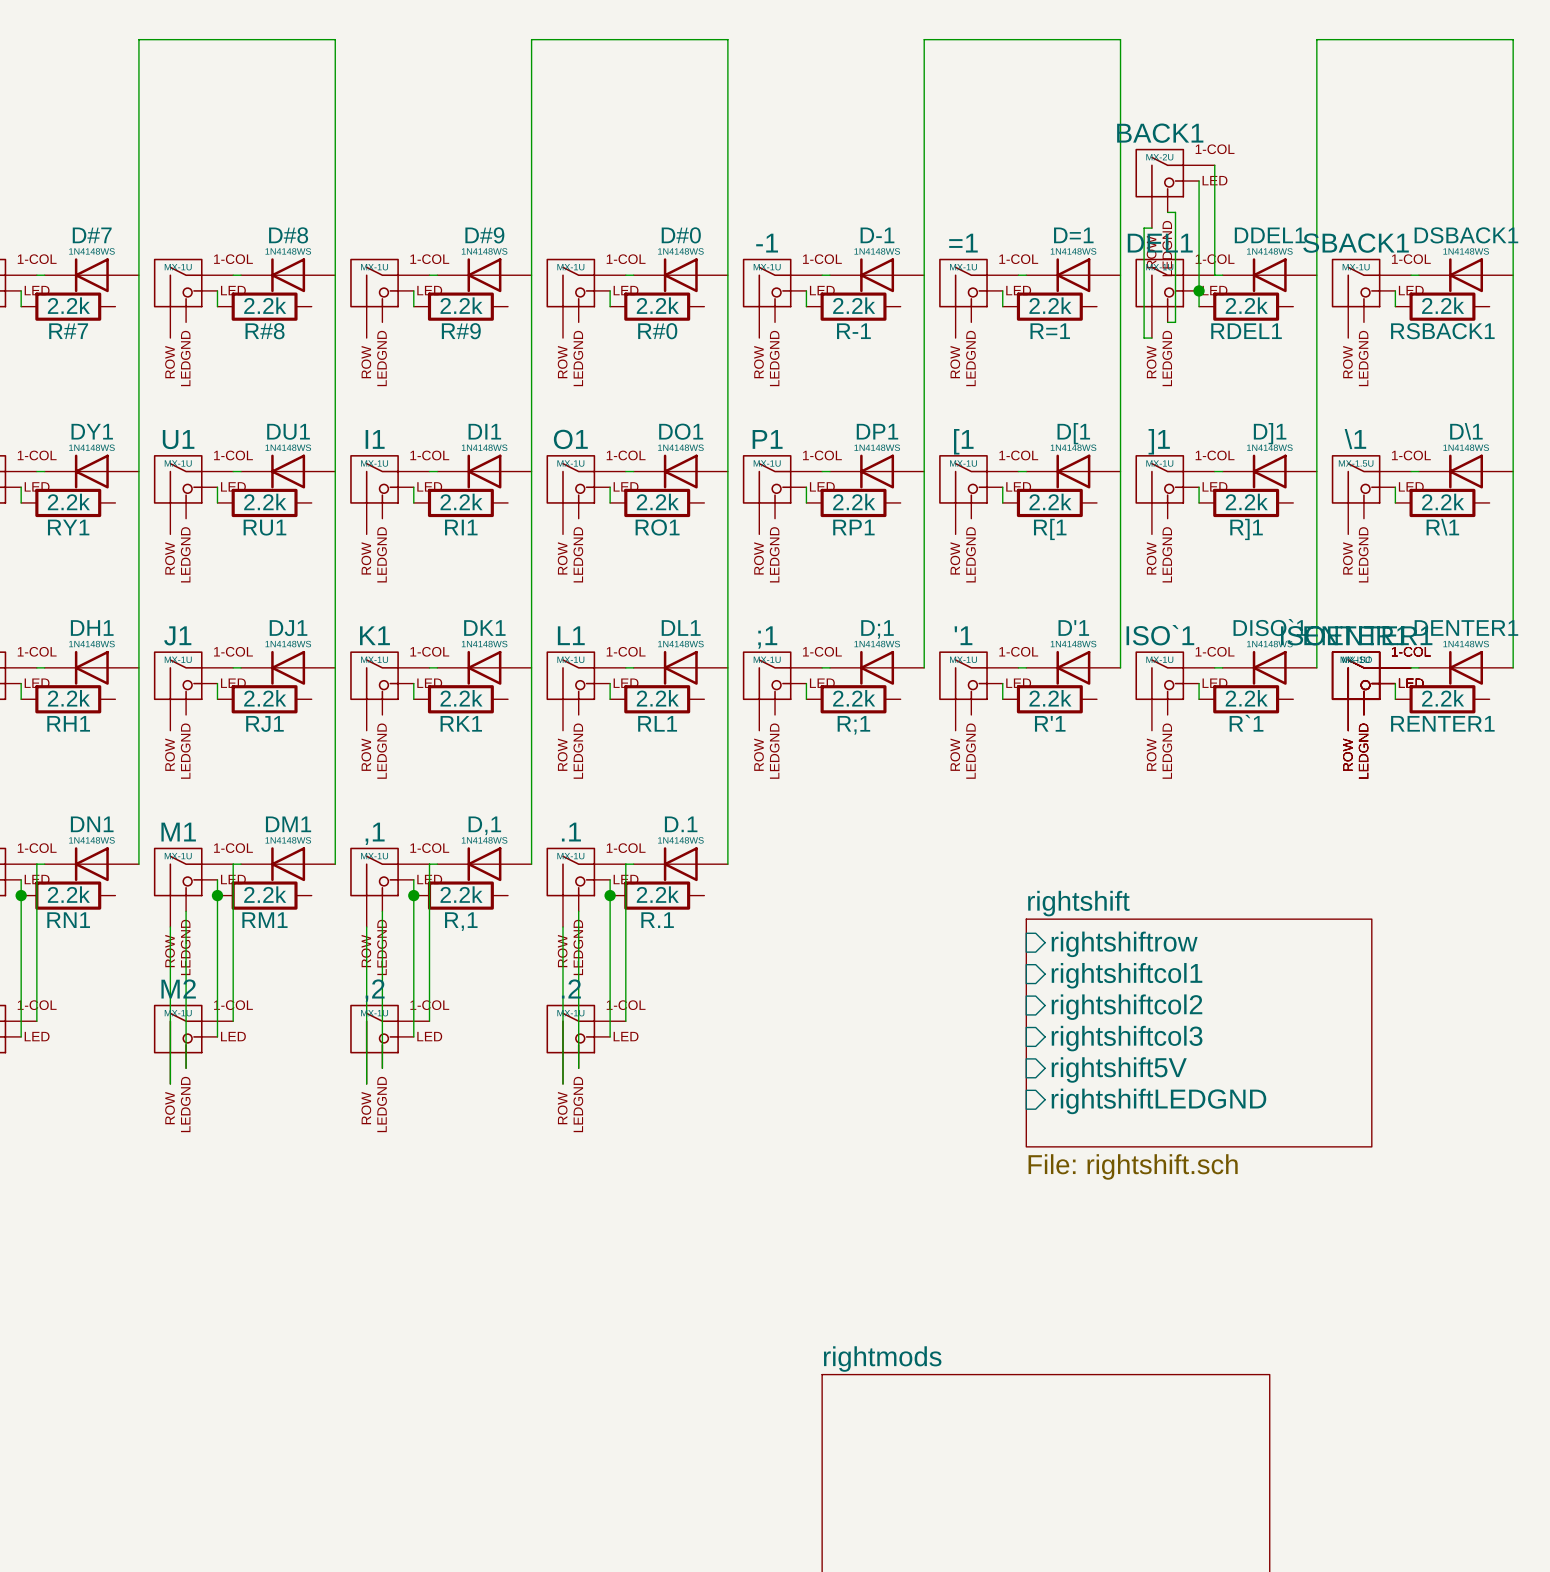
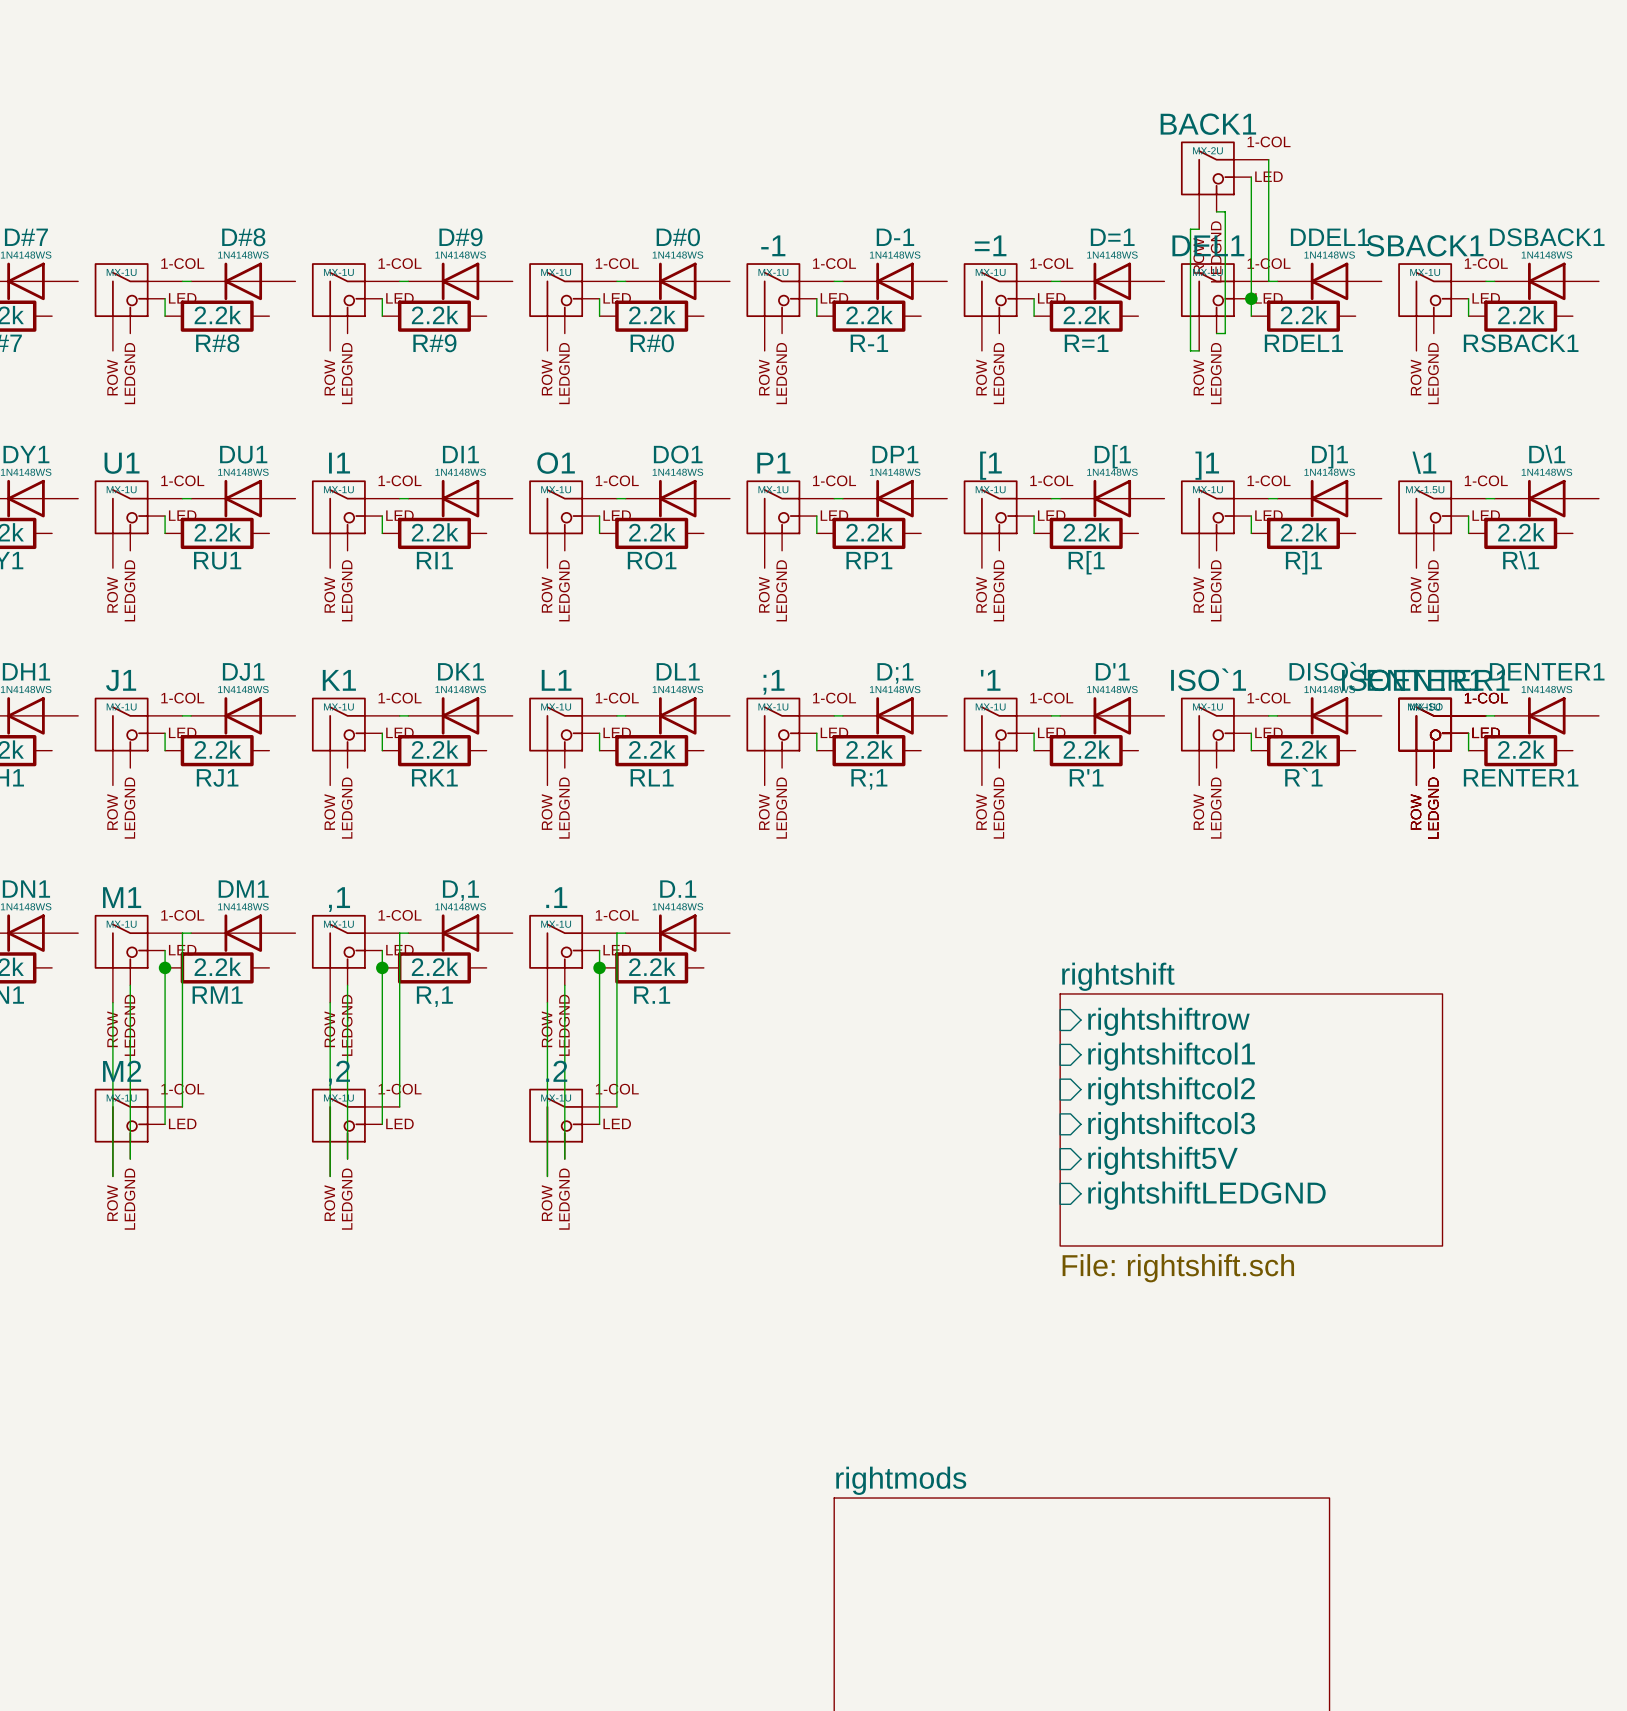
wire: (924, 667) (924, 39) (1120, 39) (1120, 667) -> none
wire: (1316, 667) (1316, 39) (1513, 39) (1513, 667) -> none
wire: (138, 864) (138, 39) (335, 39) (335, 864) -> none
wire: (531, 864) (531, 39) (727, 39) (727, 864) -> none

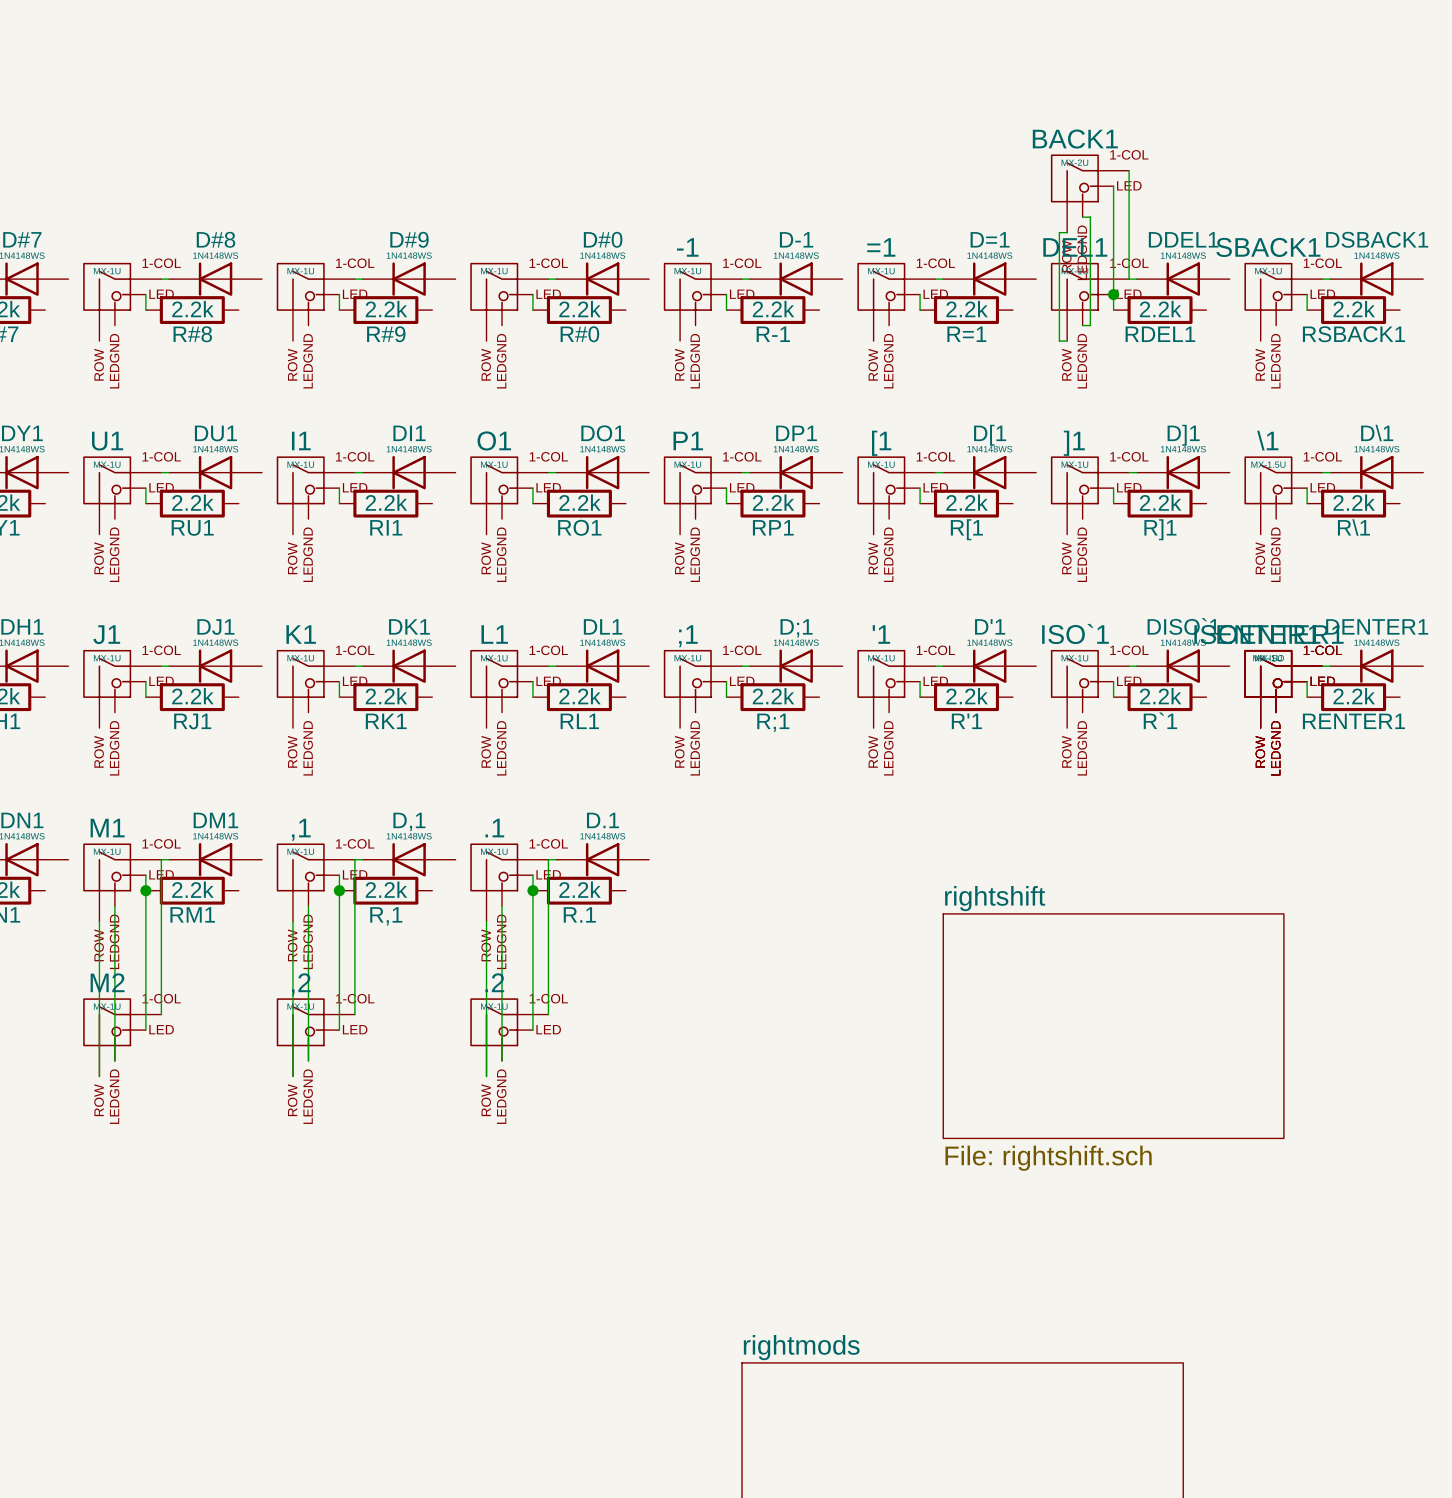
sheet pin: rightshiftrow (1168, 1021) -> none
sheet pin: rightshiftcol1 (1171, 1056) -> none
sheet pin: rightshiftcol2 (1171, 1091) -> none
sheet pin: rightshiftcol3 (1171, 1126) -> none
sheet pin: rightshift5V (1162, 1160) -> none
sheet pin: rightshiftLEDGND (1206, 1195) -> none

